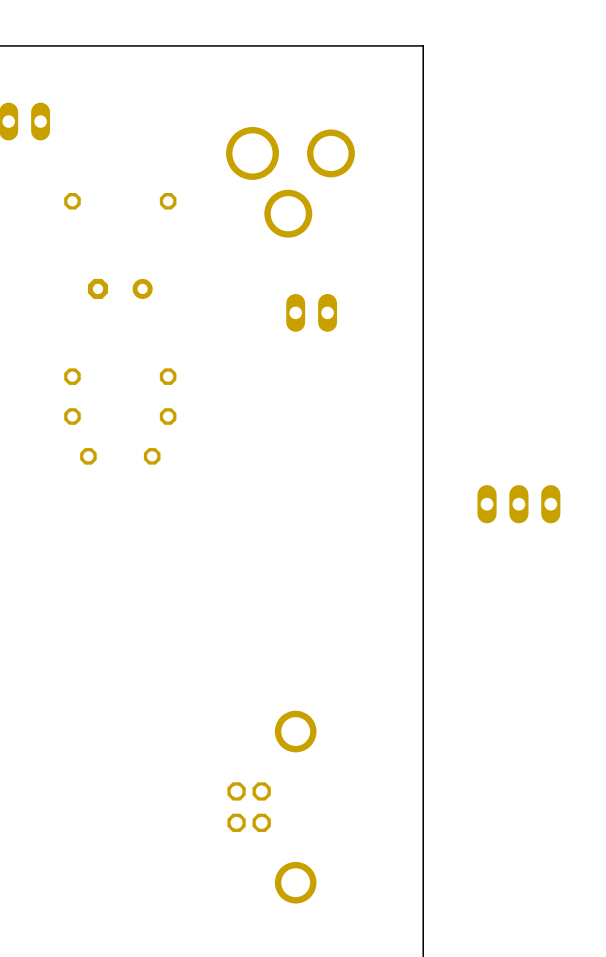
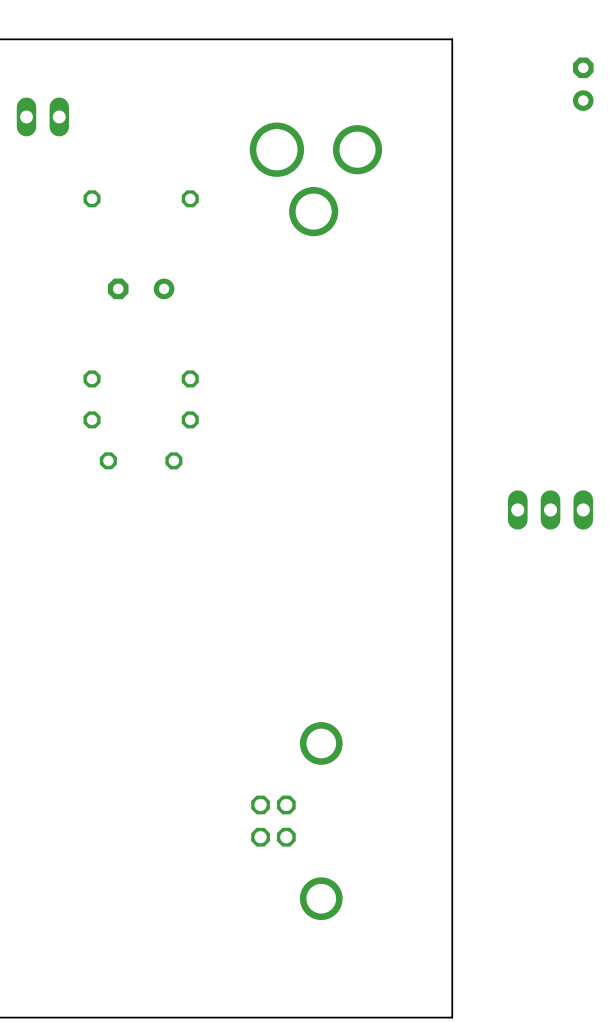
part: none -> (583, 84)
part: (311, 312) -> none

